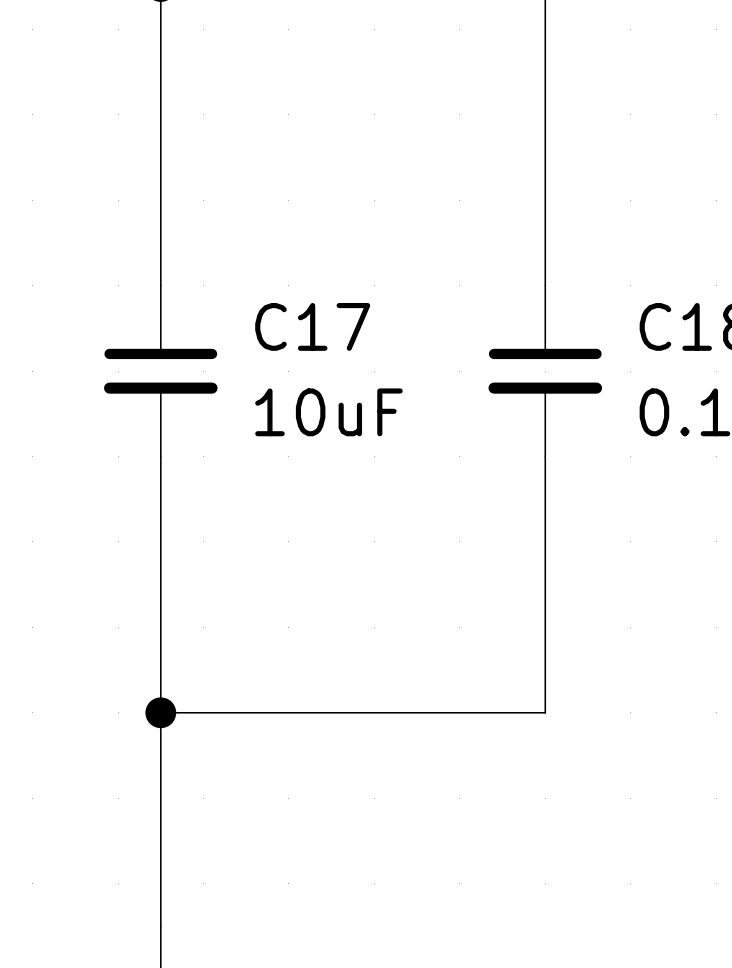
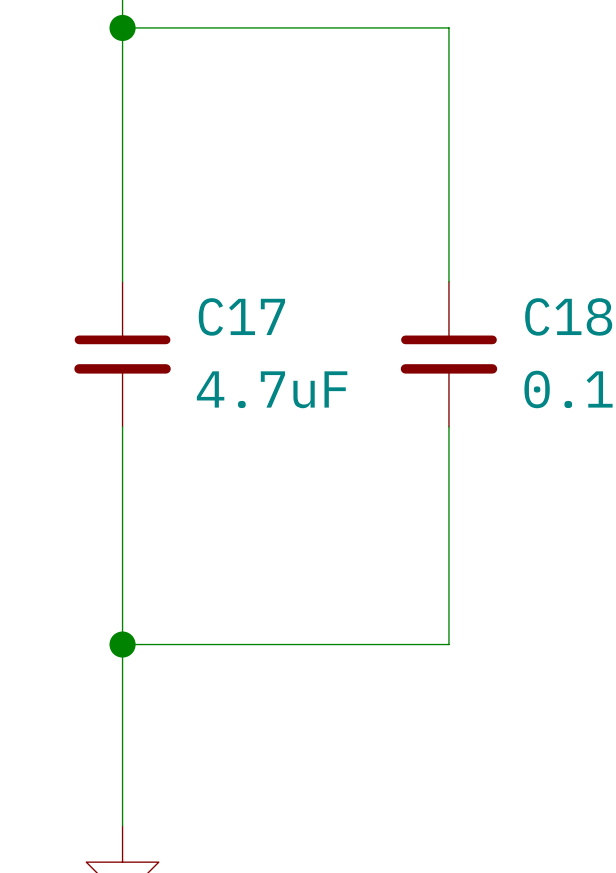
C17 value: 10uF (328, 412) -> 4.7uF (272, 389)

